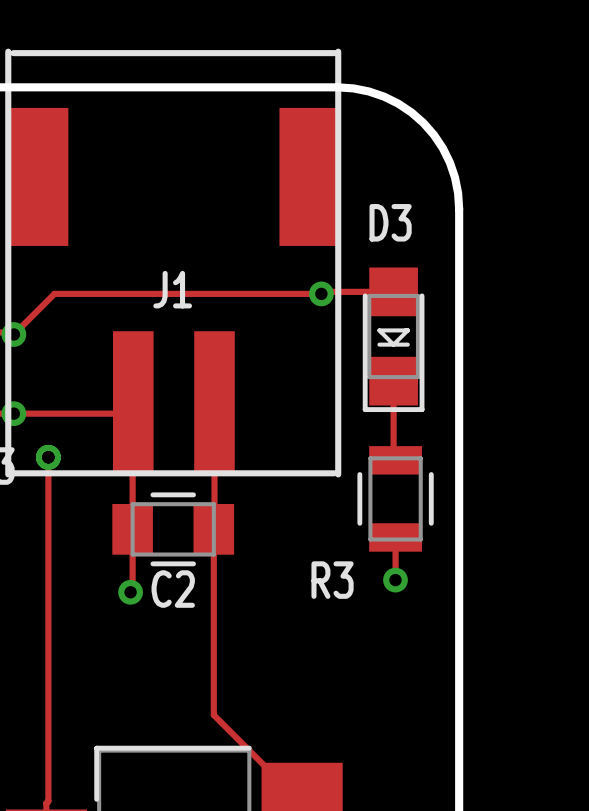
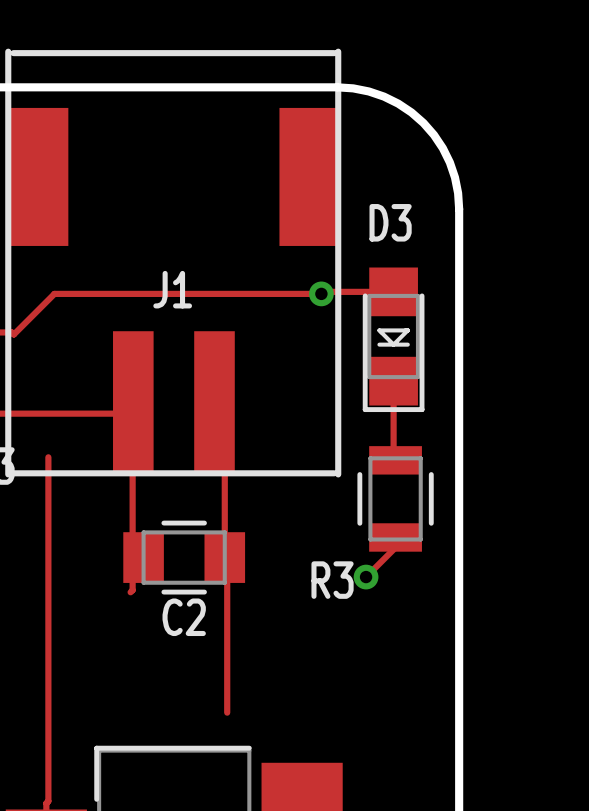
via: (13, 334) -> none
track: (214, 402) (213, 715) (291, 793) (302, 793) -> (214, 402) (224, 412) (227, 712)
via: (13, 413) -> none
via: (48, 457) -> none
C2 position: (173, 529) -> (184, 557)
track: (395, 547) (395, 580) -> (395, 547) (366, 577)
via position: (395, 580) -> (366, 577)
via: (130, 592) -> none

